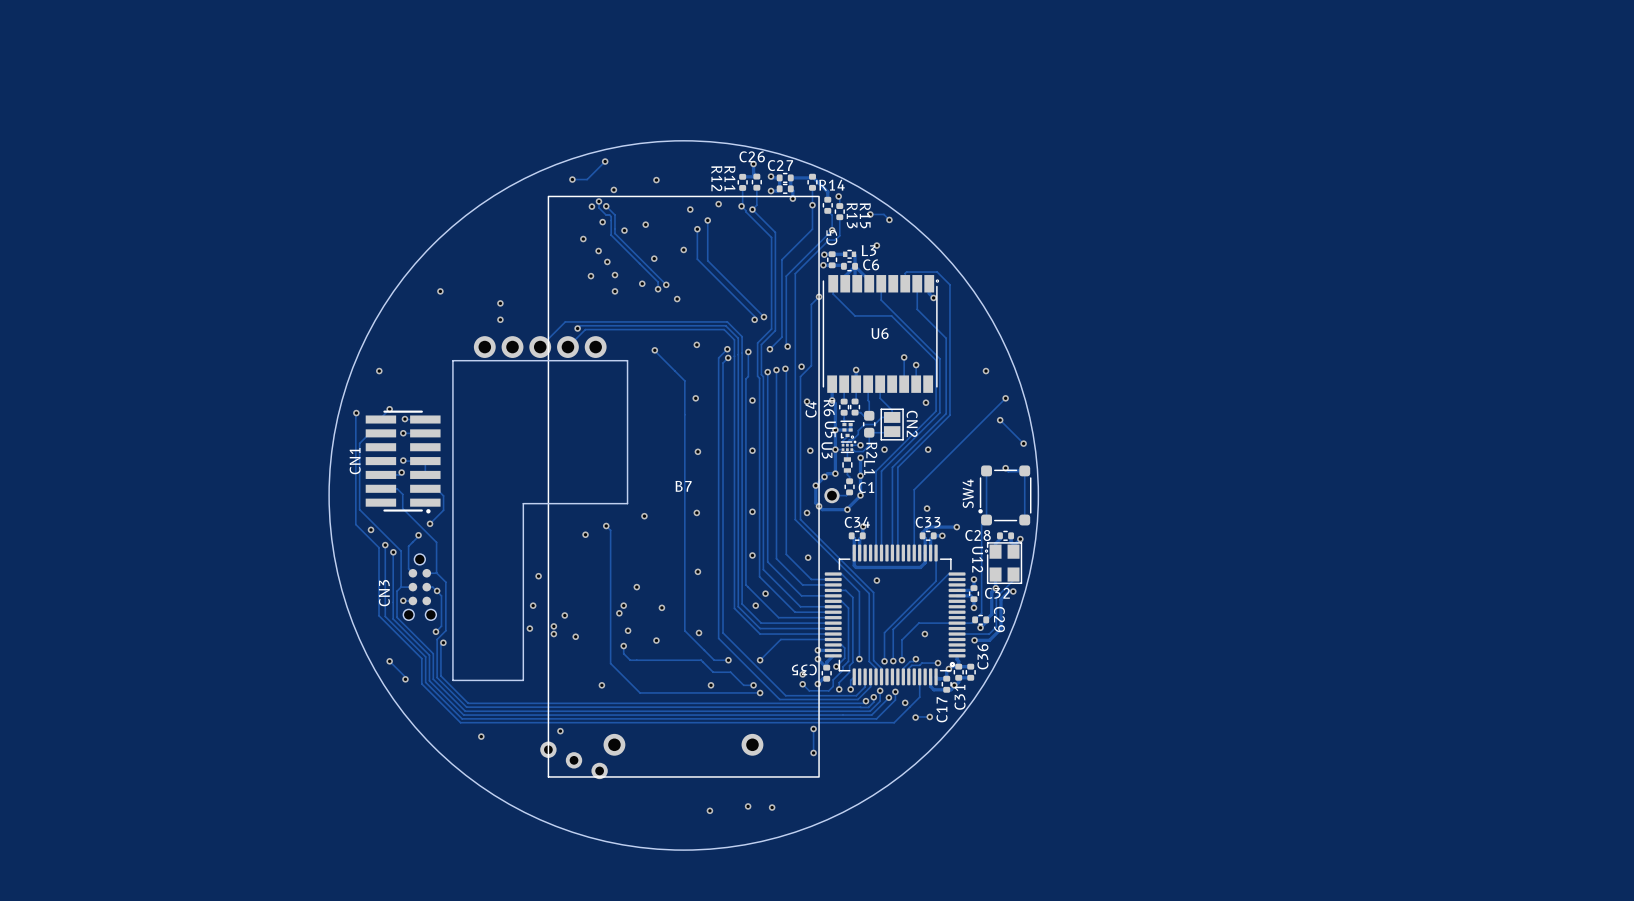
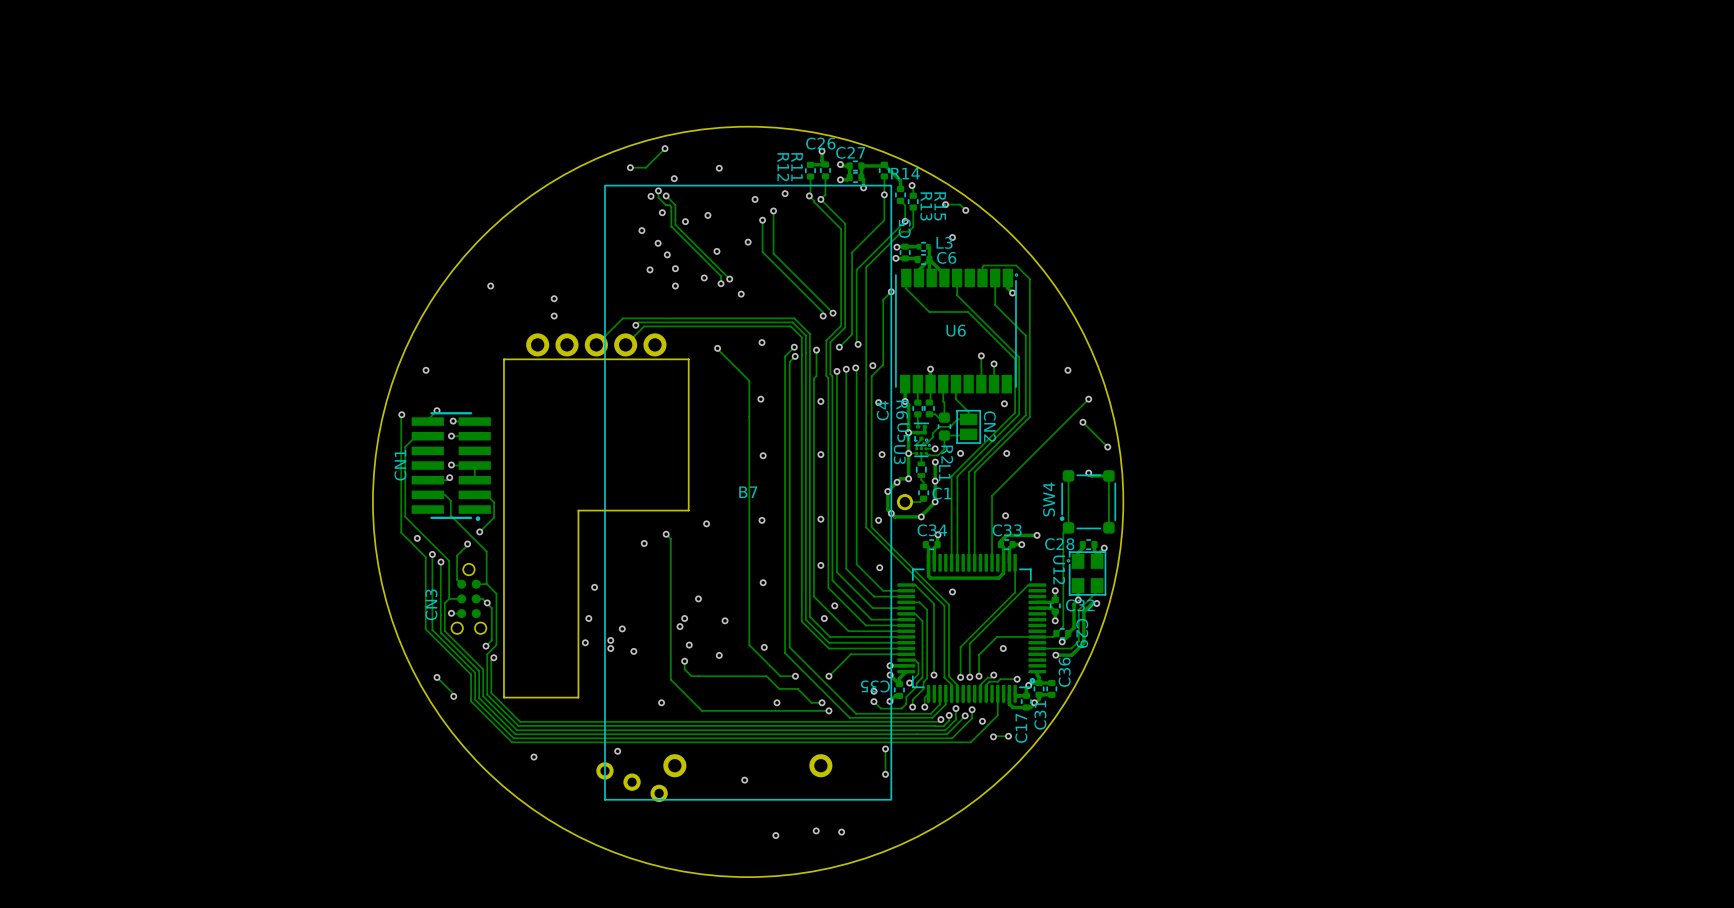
via: none -> (744, 780)

